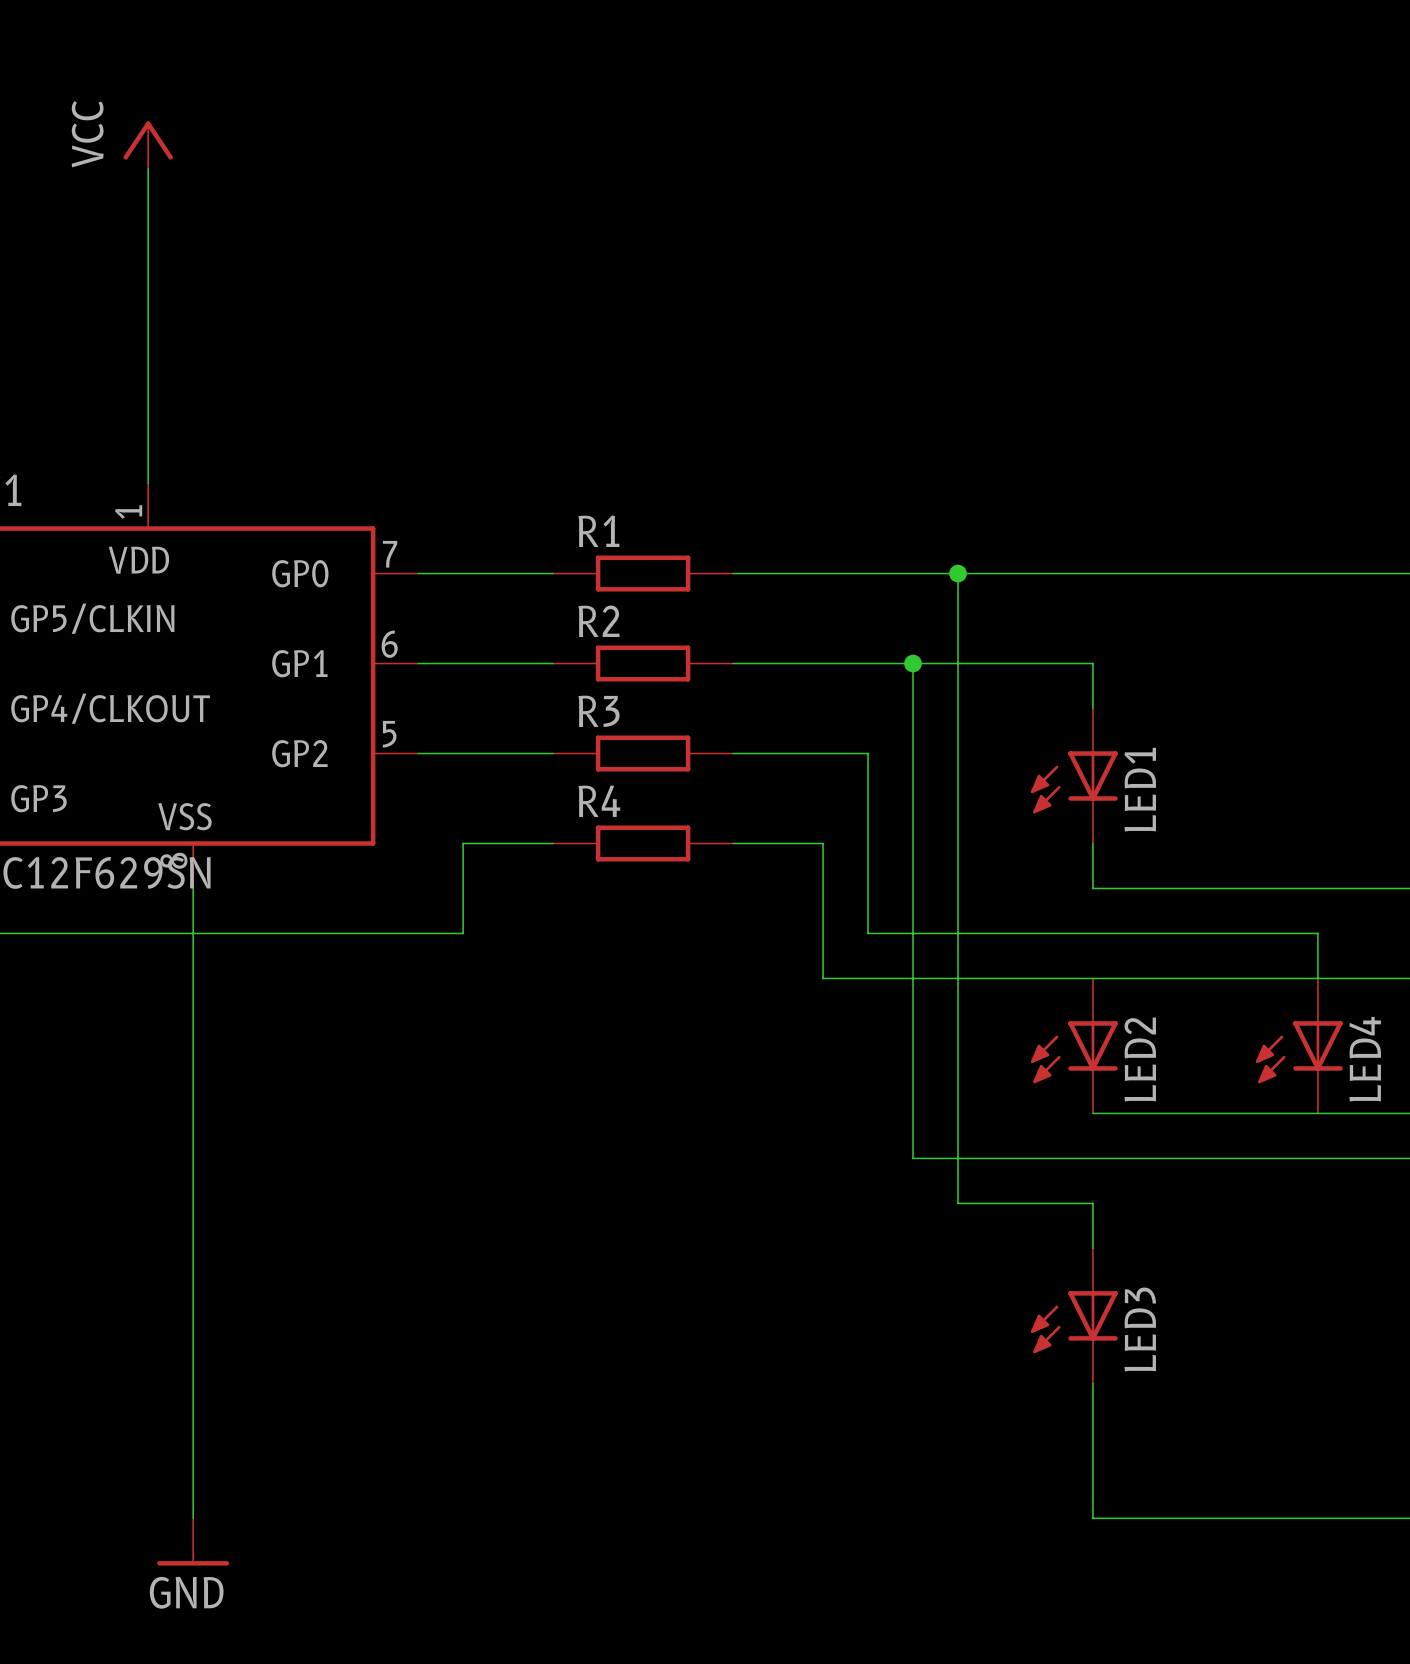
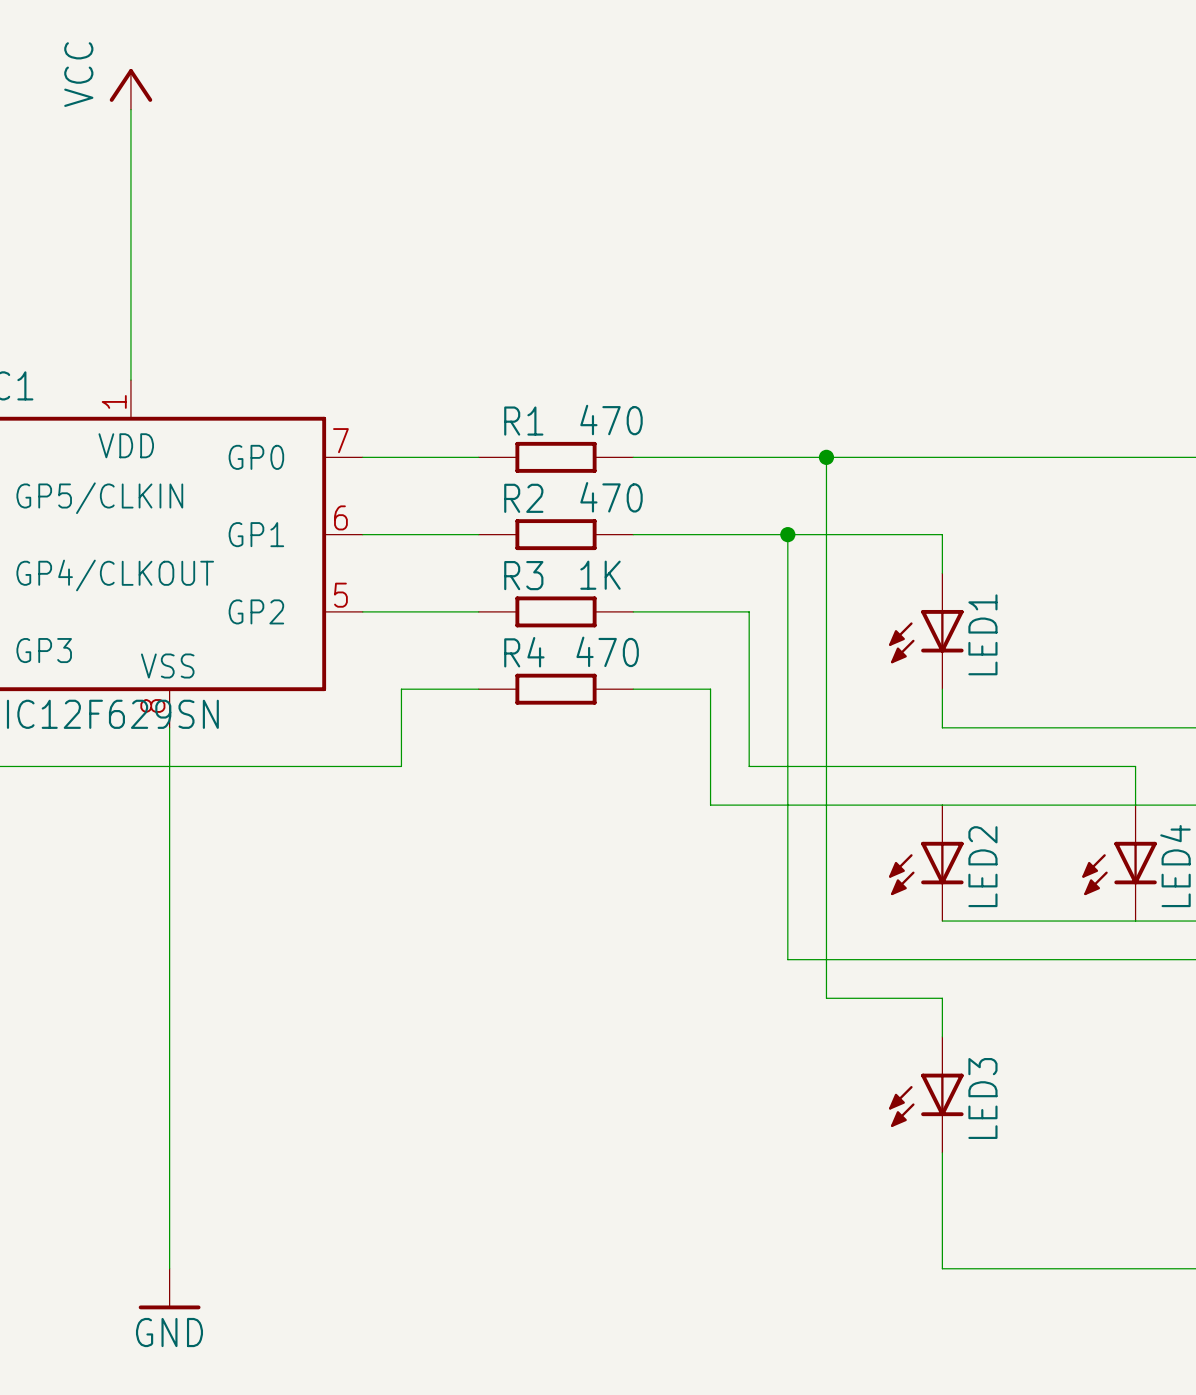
R1 value: none -> 470 (611, 420)
R2 value: none -> 470 (611, 497)
R3 value: none -> 1K (600, 575)
R4 value: none -> 470 (607, 651)

